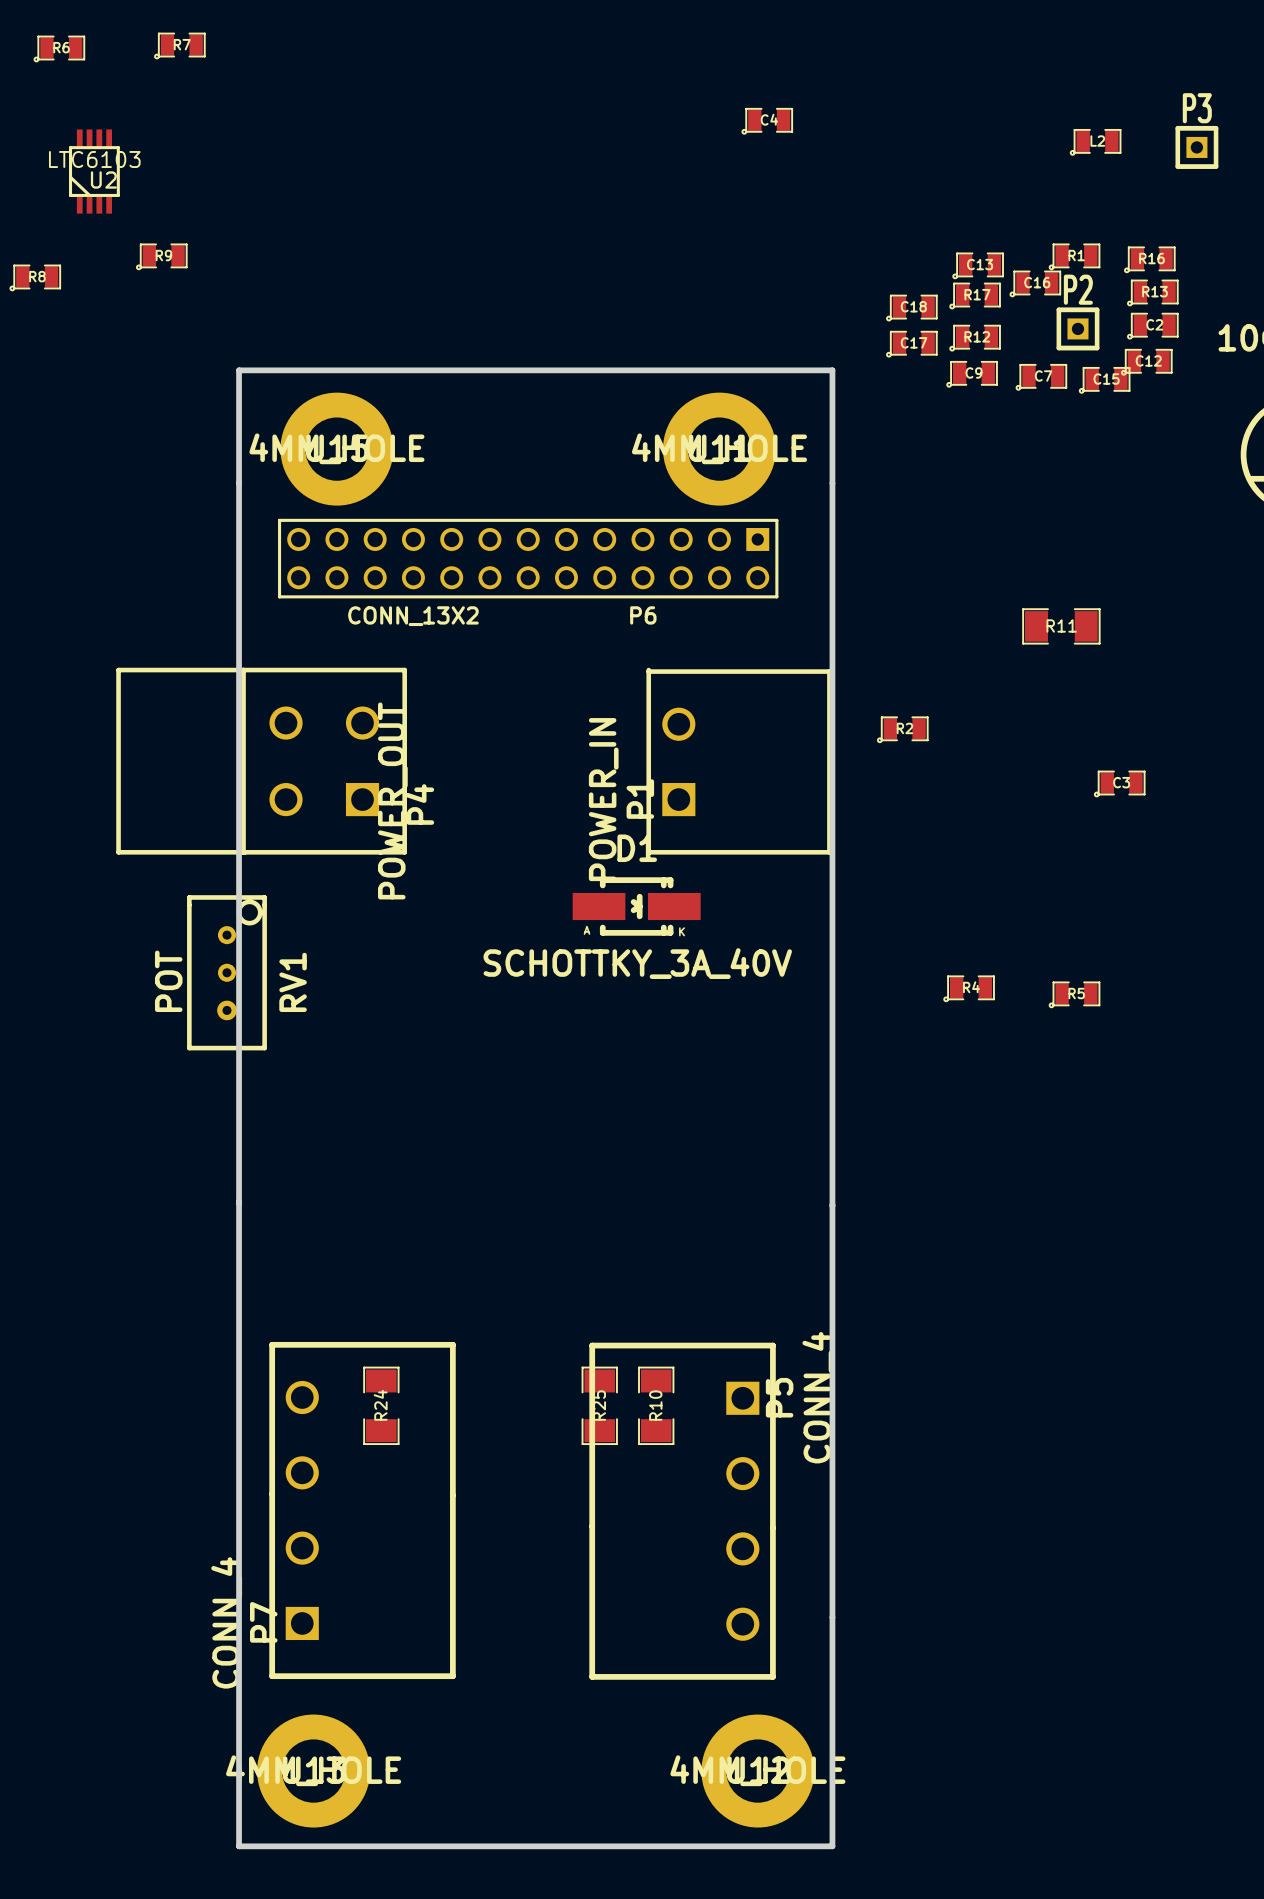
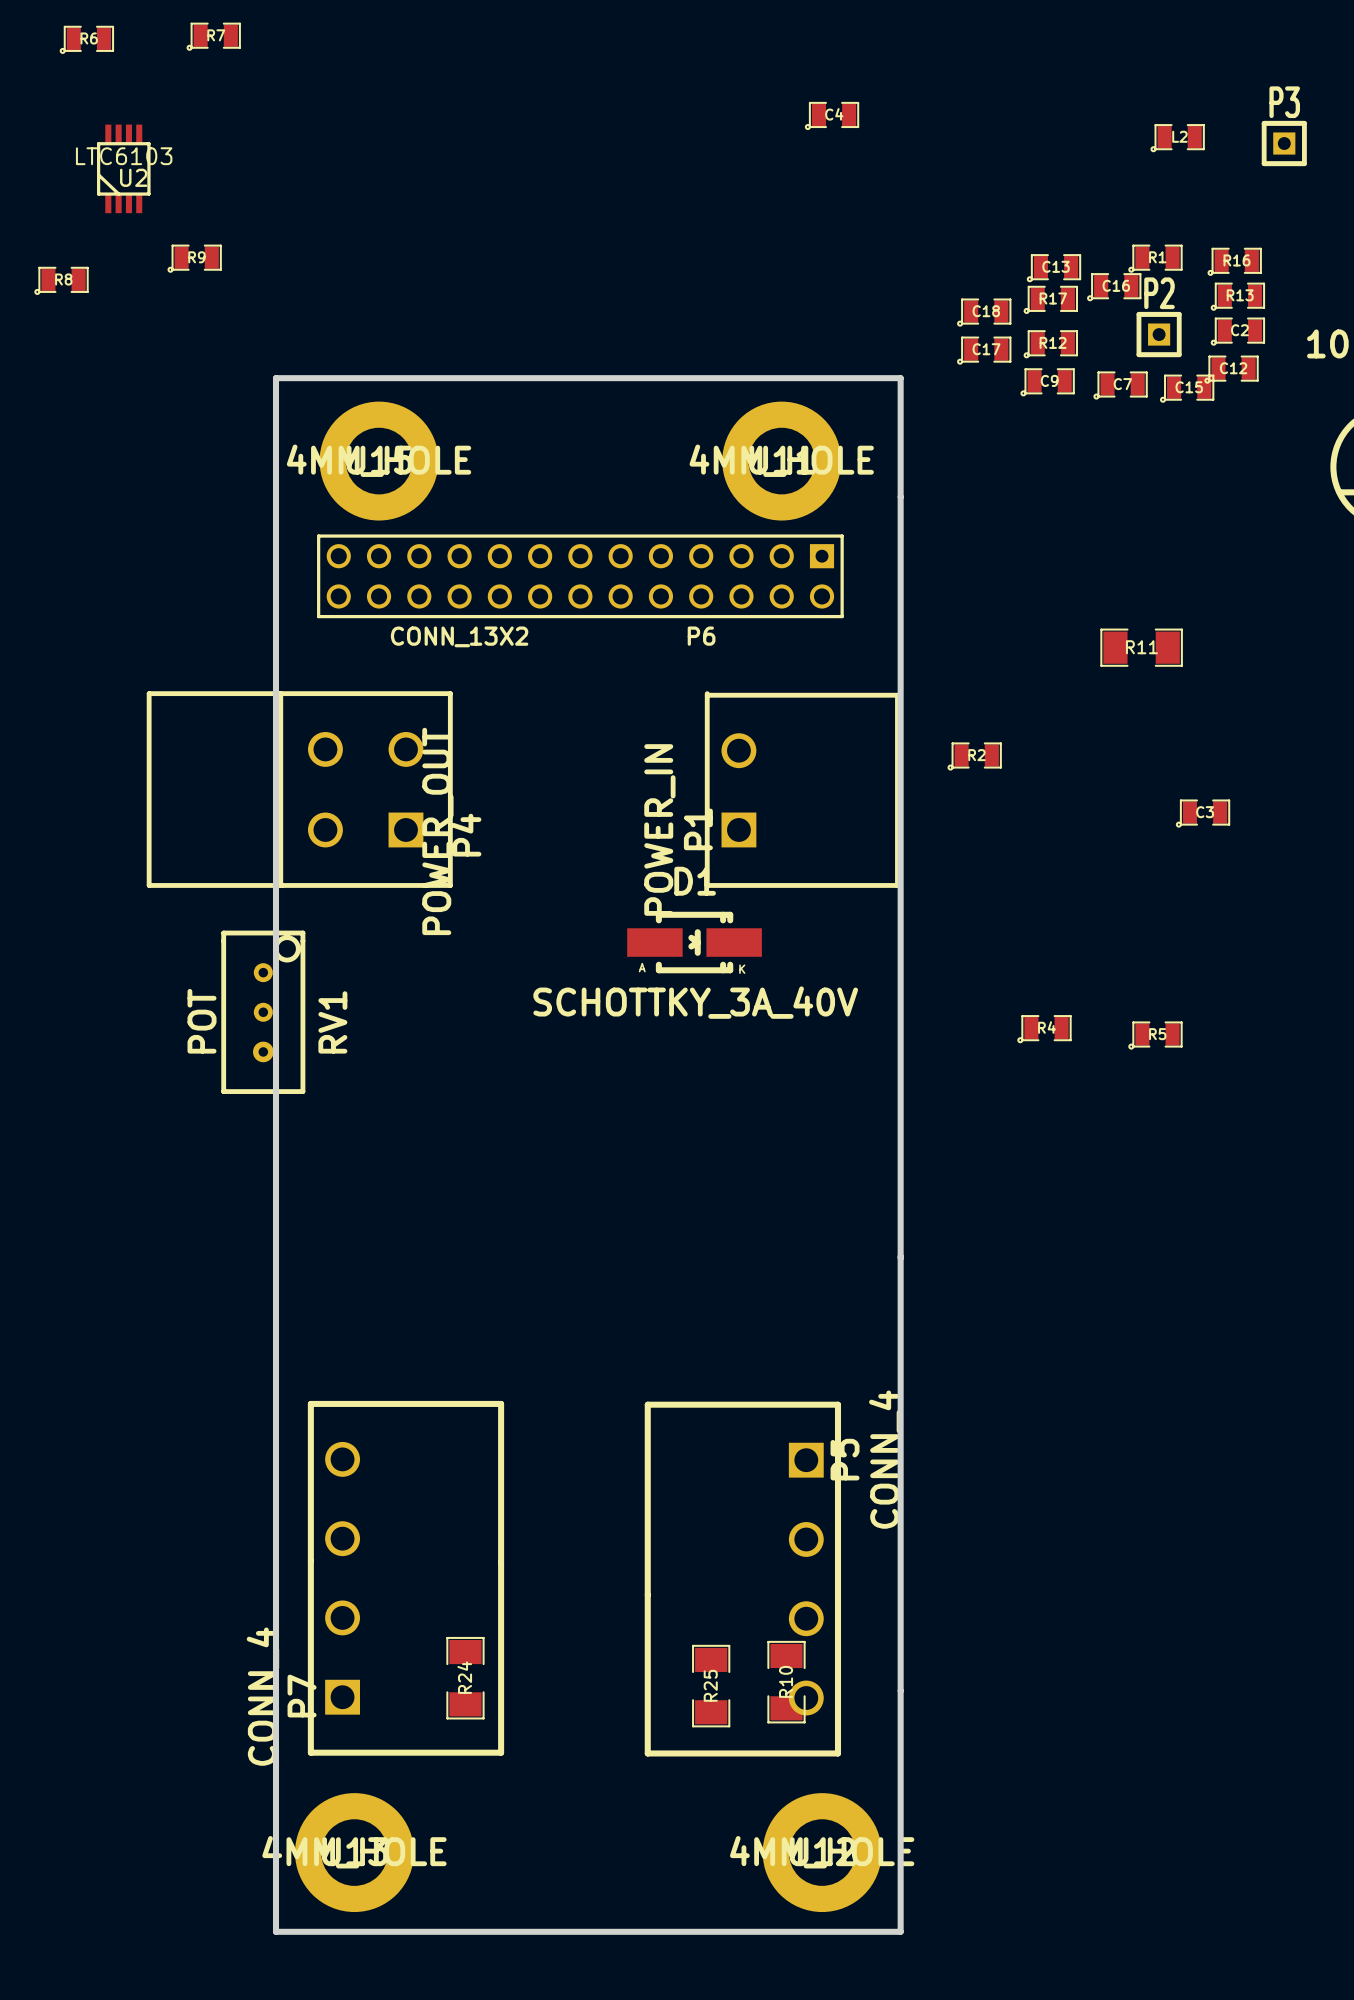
R24 position: (381, 1405) -> (465, 1678)
R25 position: (599, 1405) -> (711, 1686)
R10 position: (656, 1405) -> (786, 1682)

